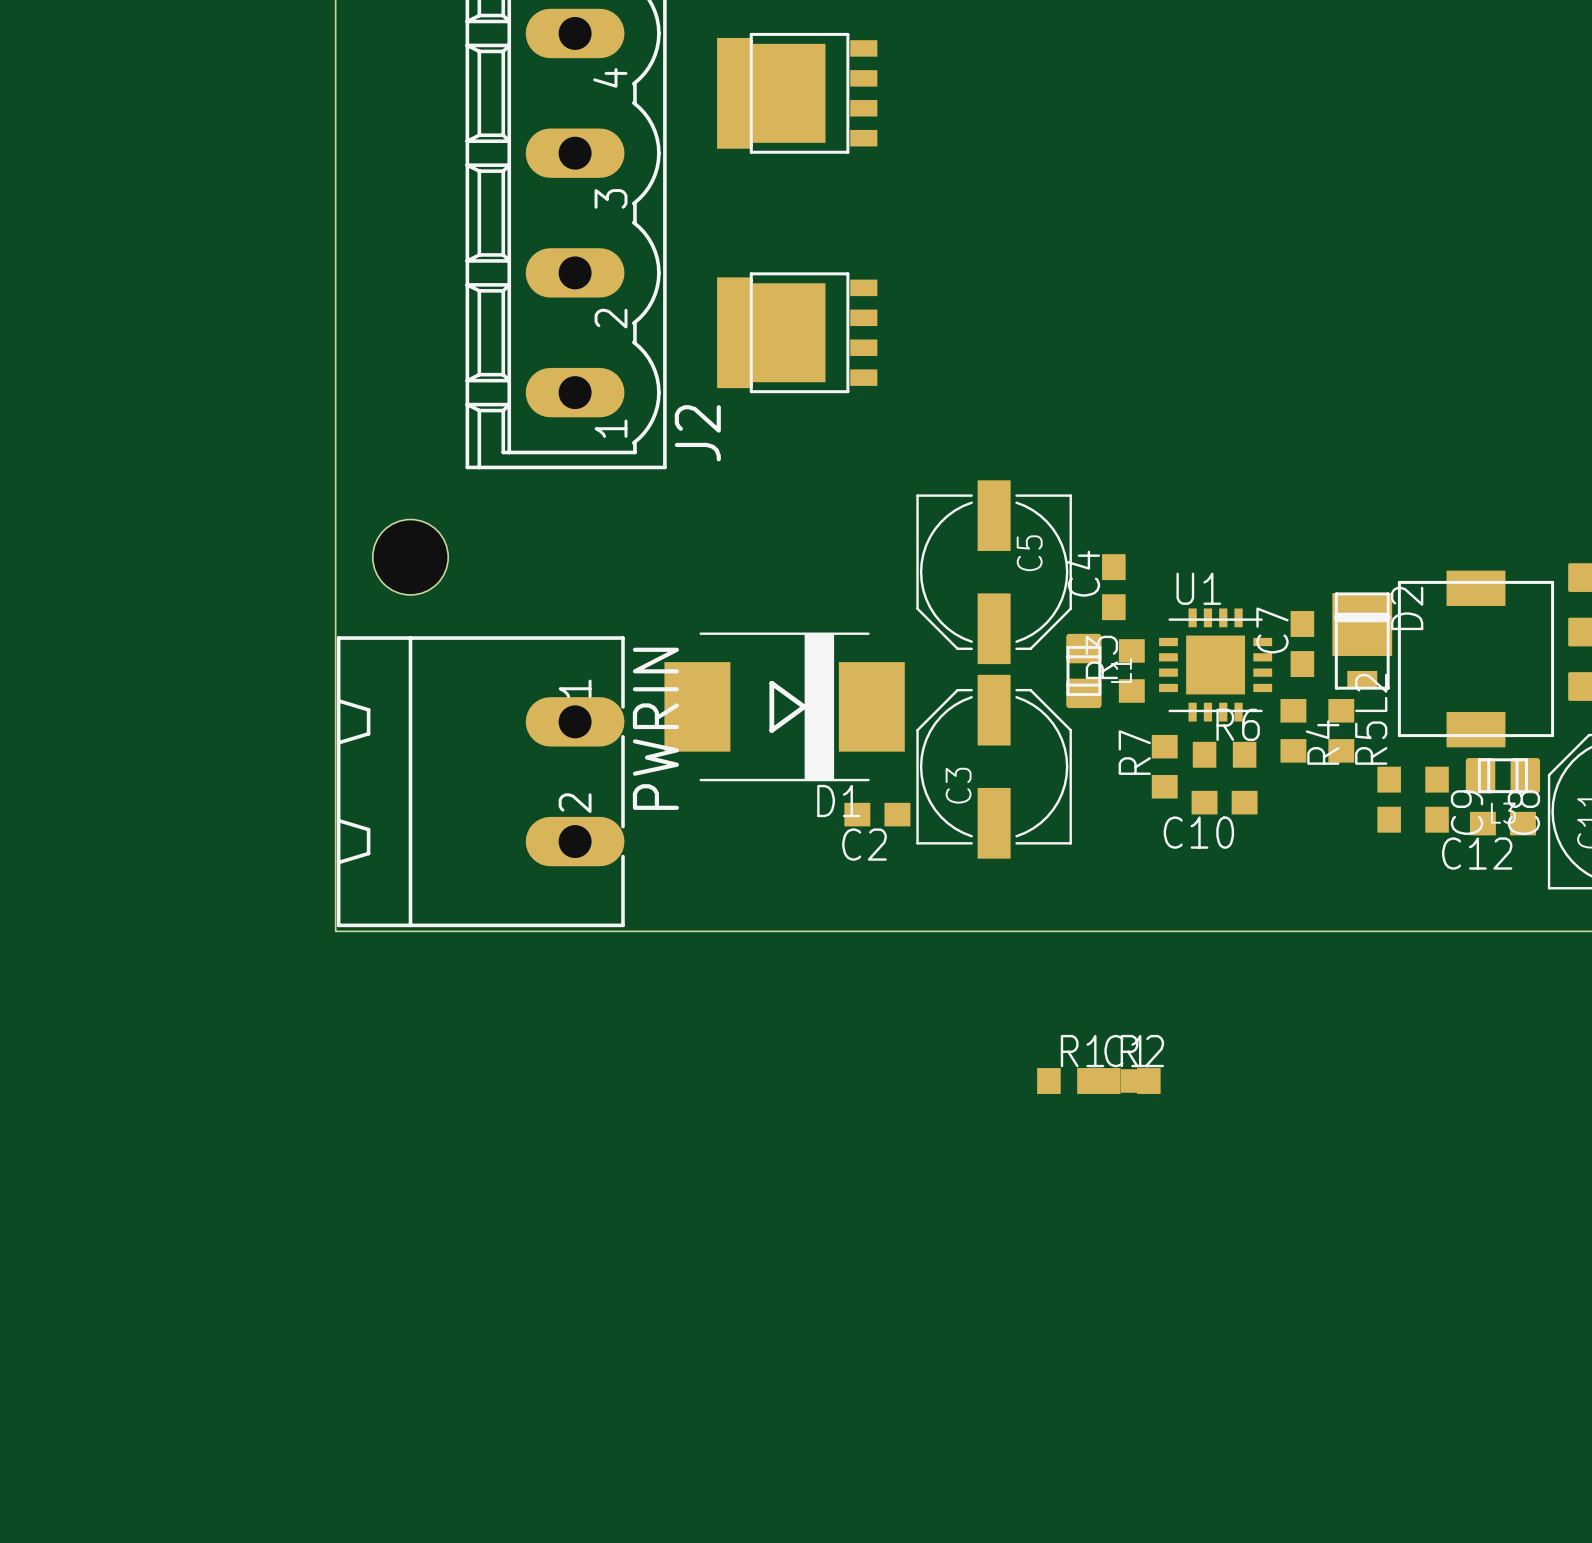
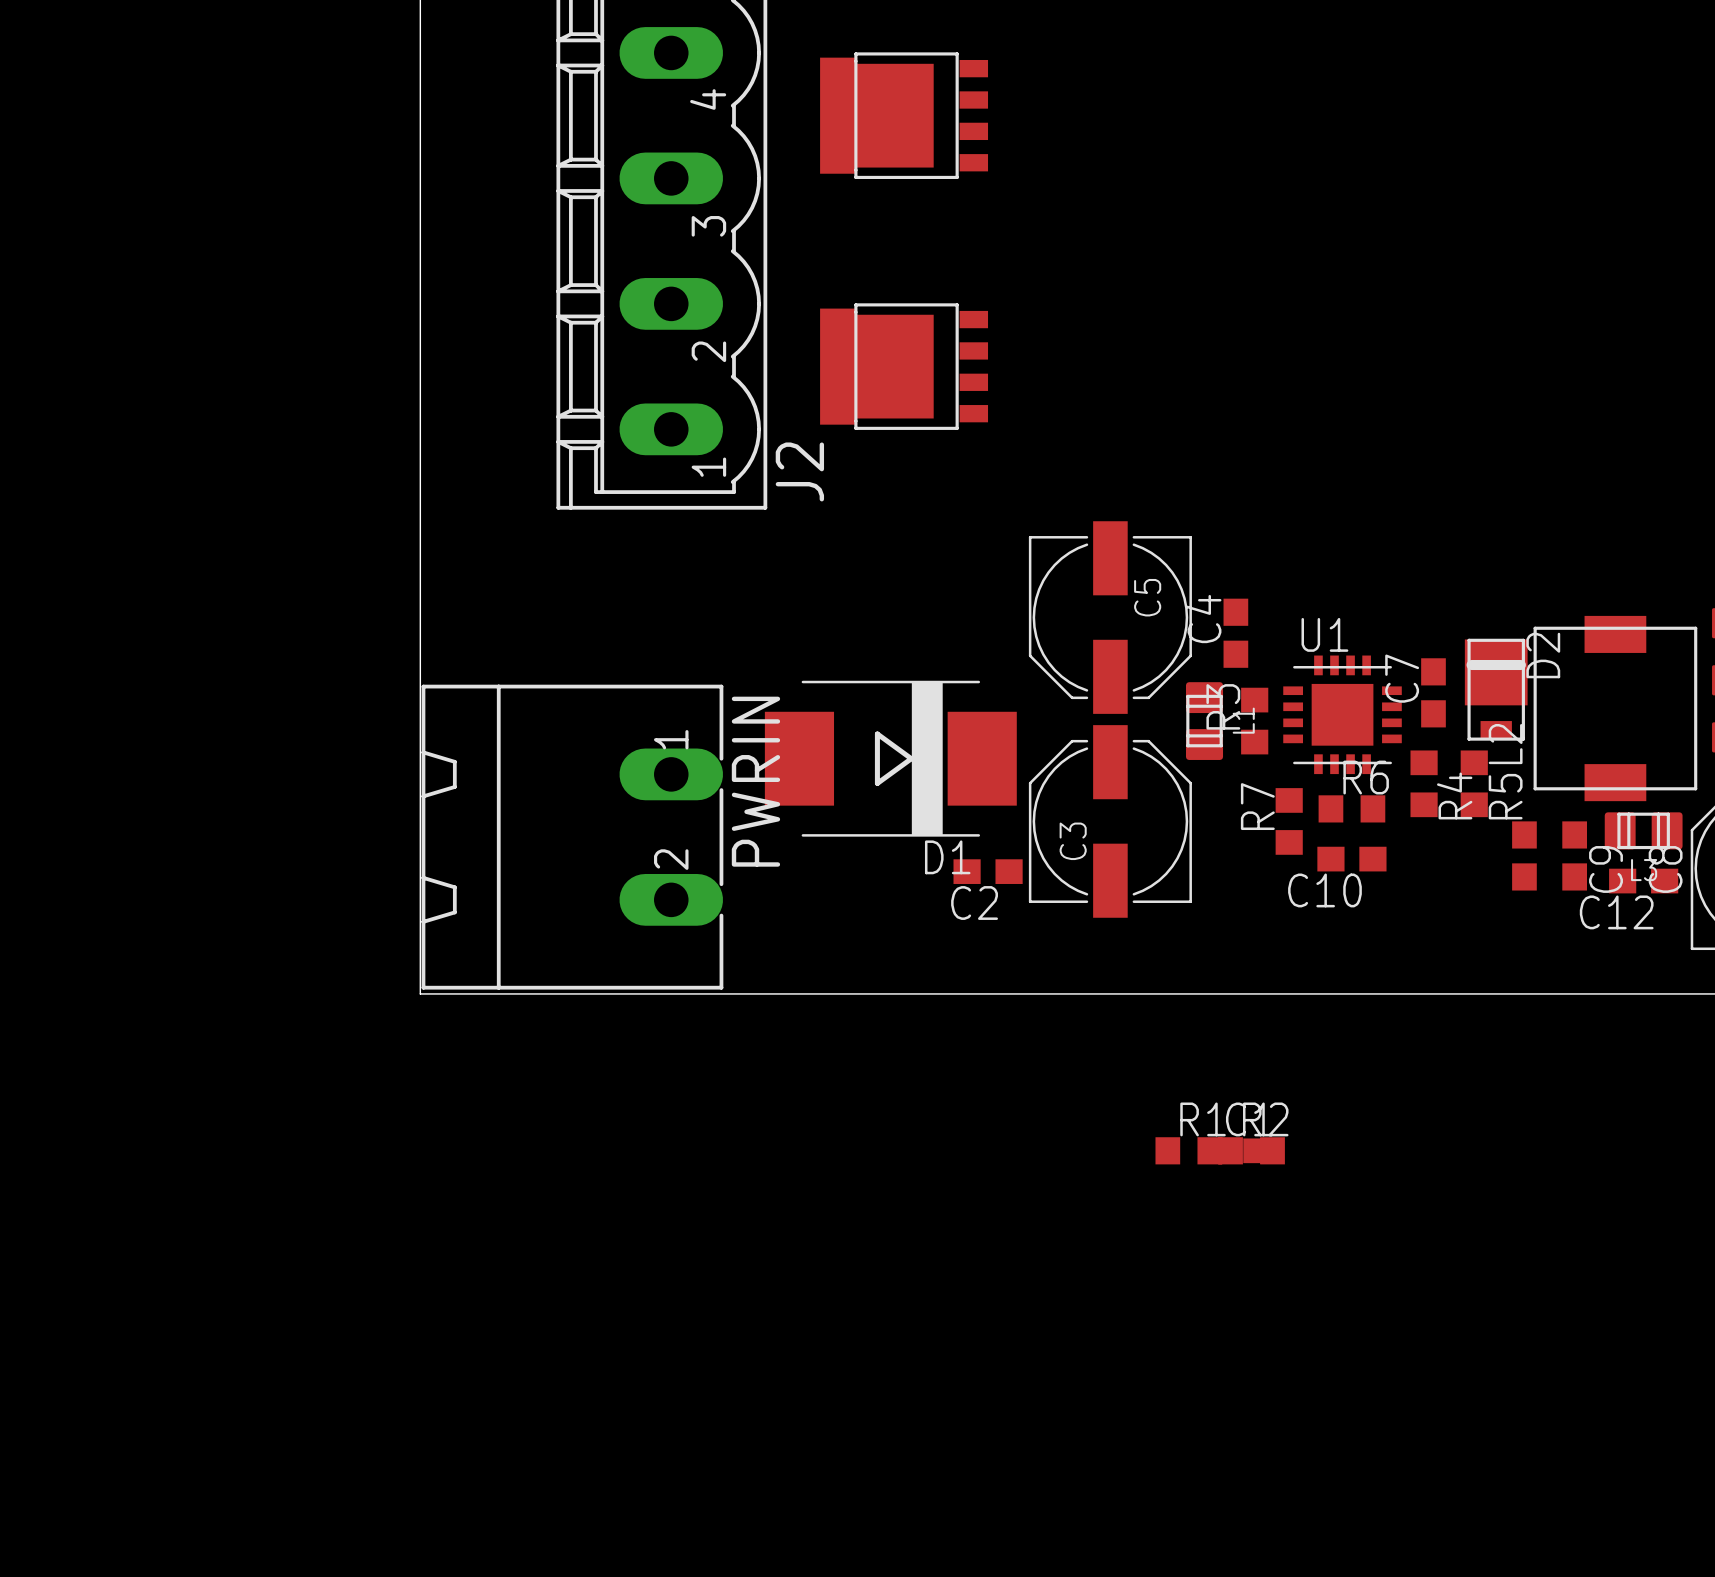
hole: (410, 557) -> none

